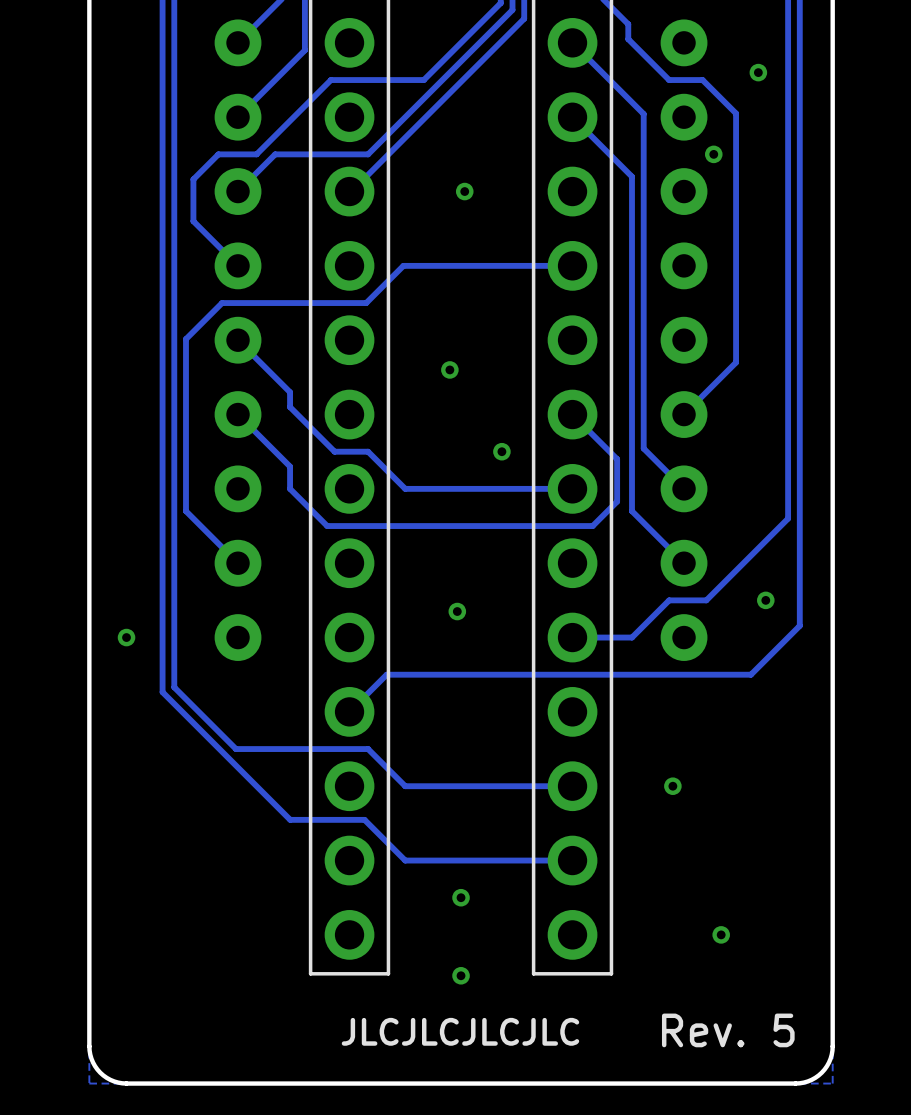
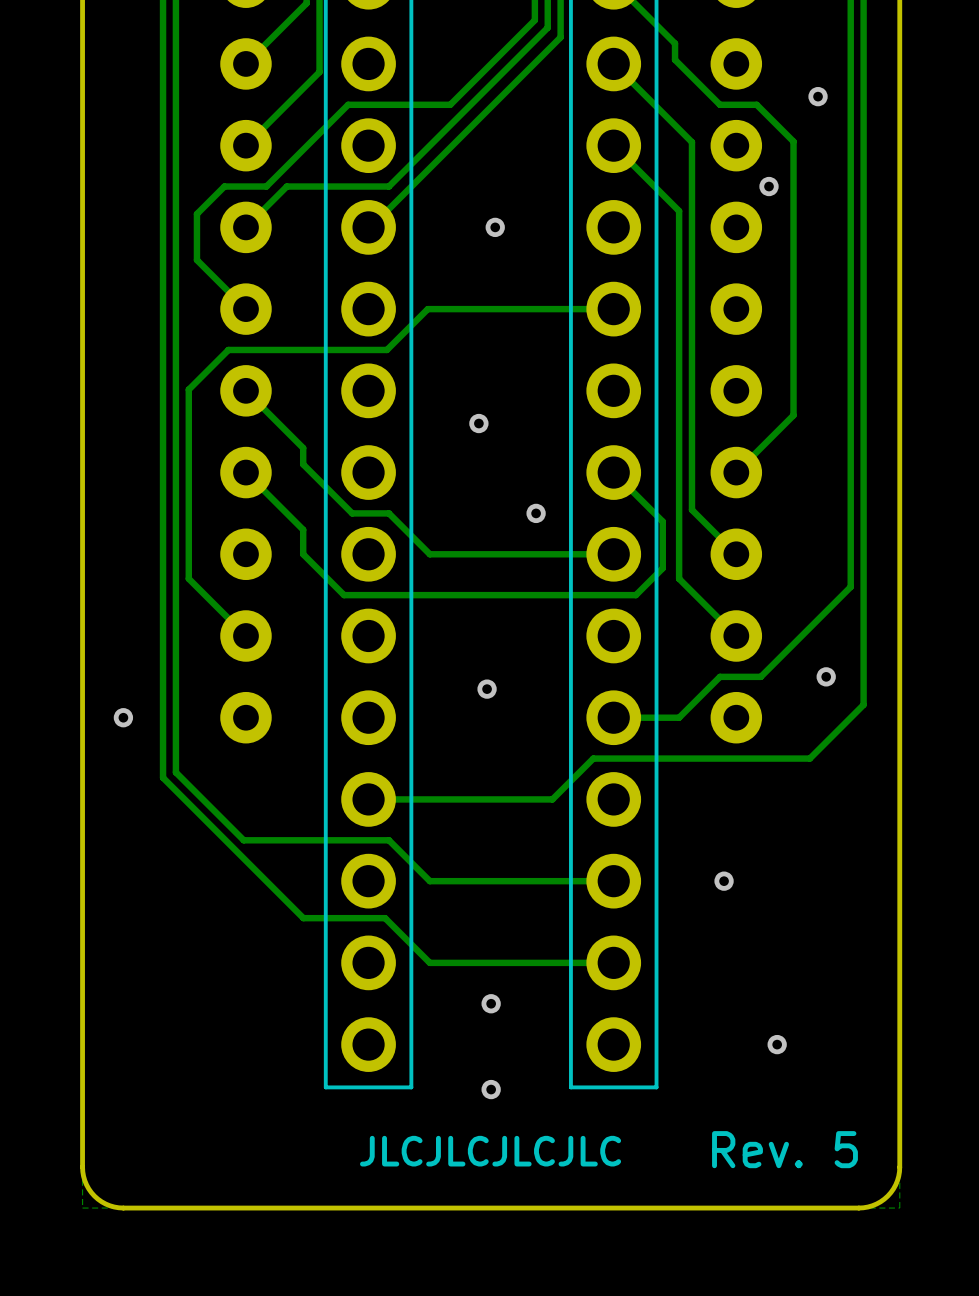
track: (553, 674) (386, 674) (349, 711) -> (593, 758) (552, 799) (368, 799)

